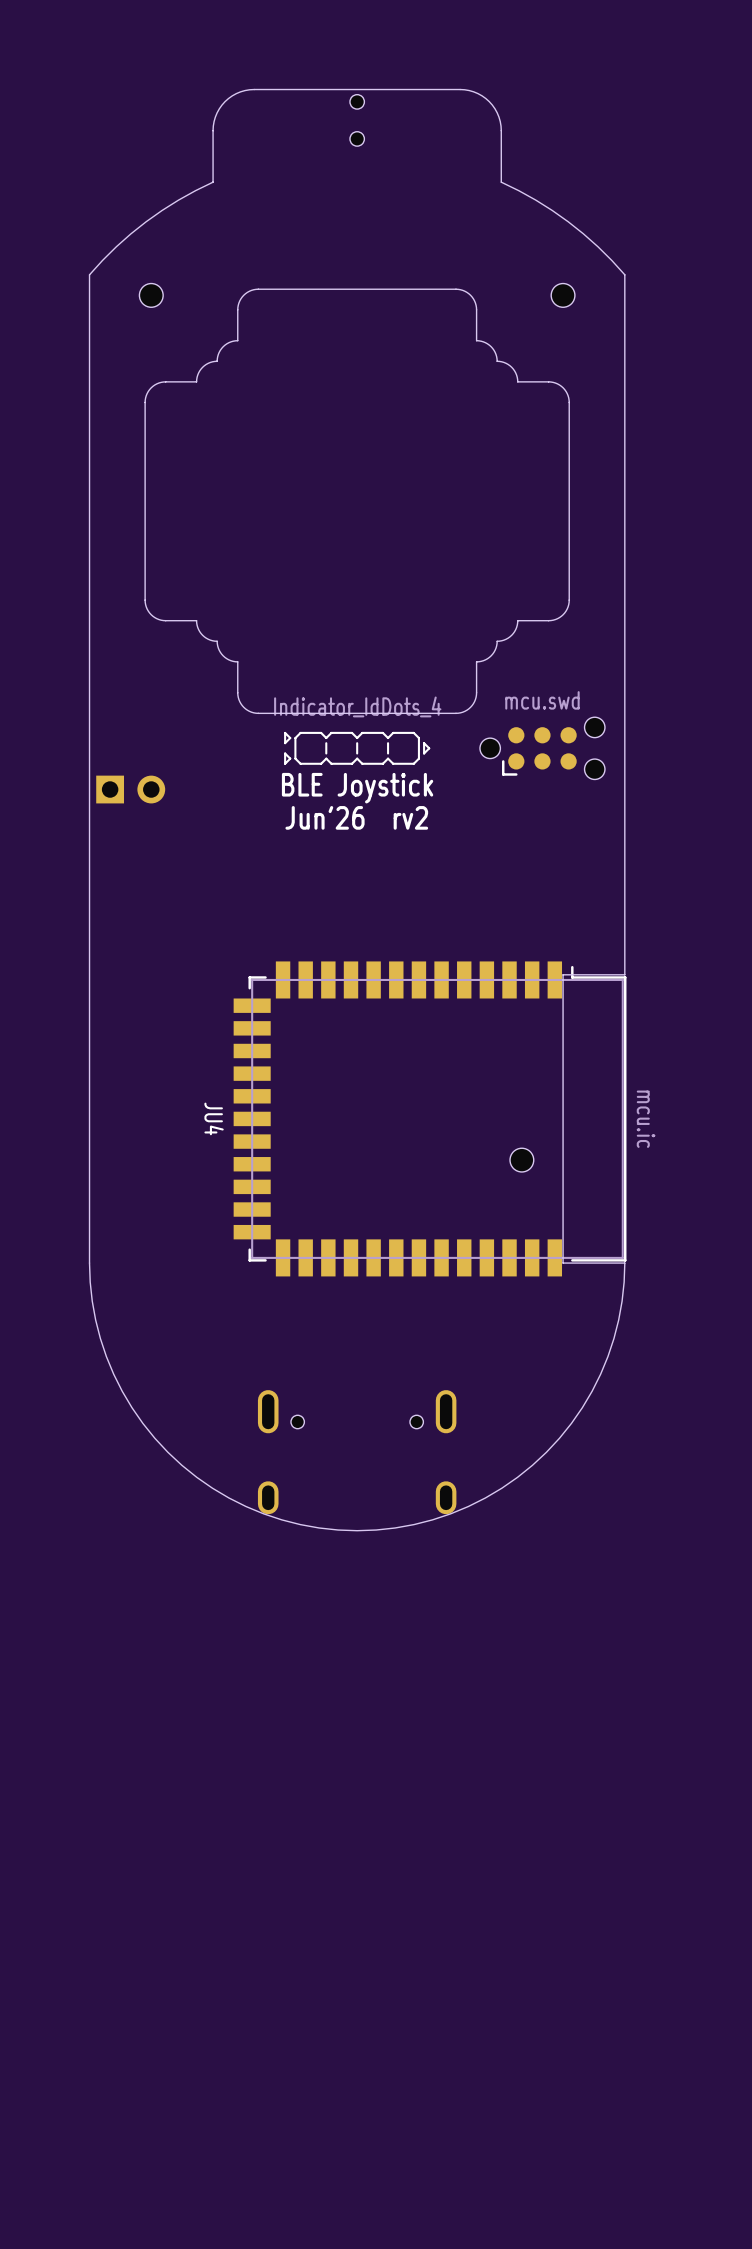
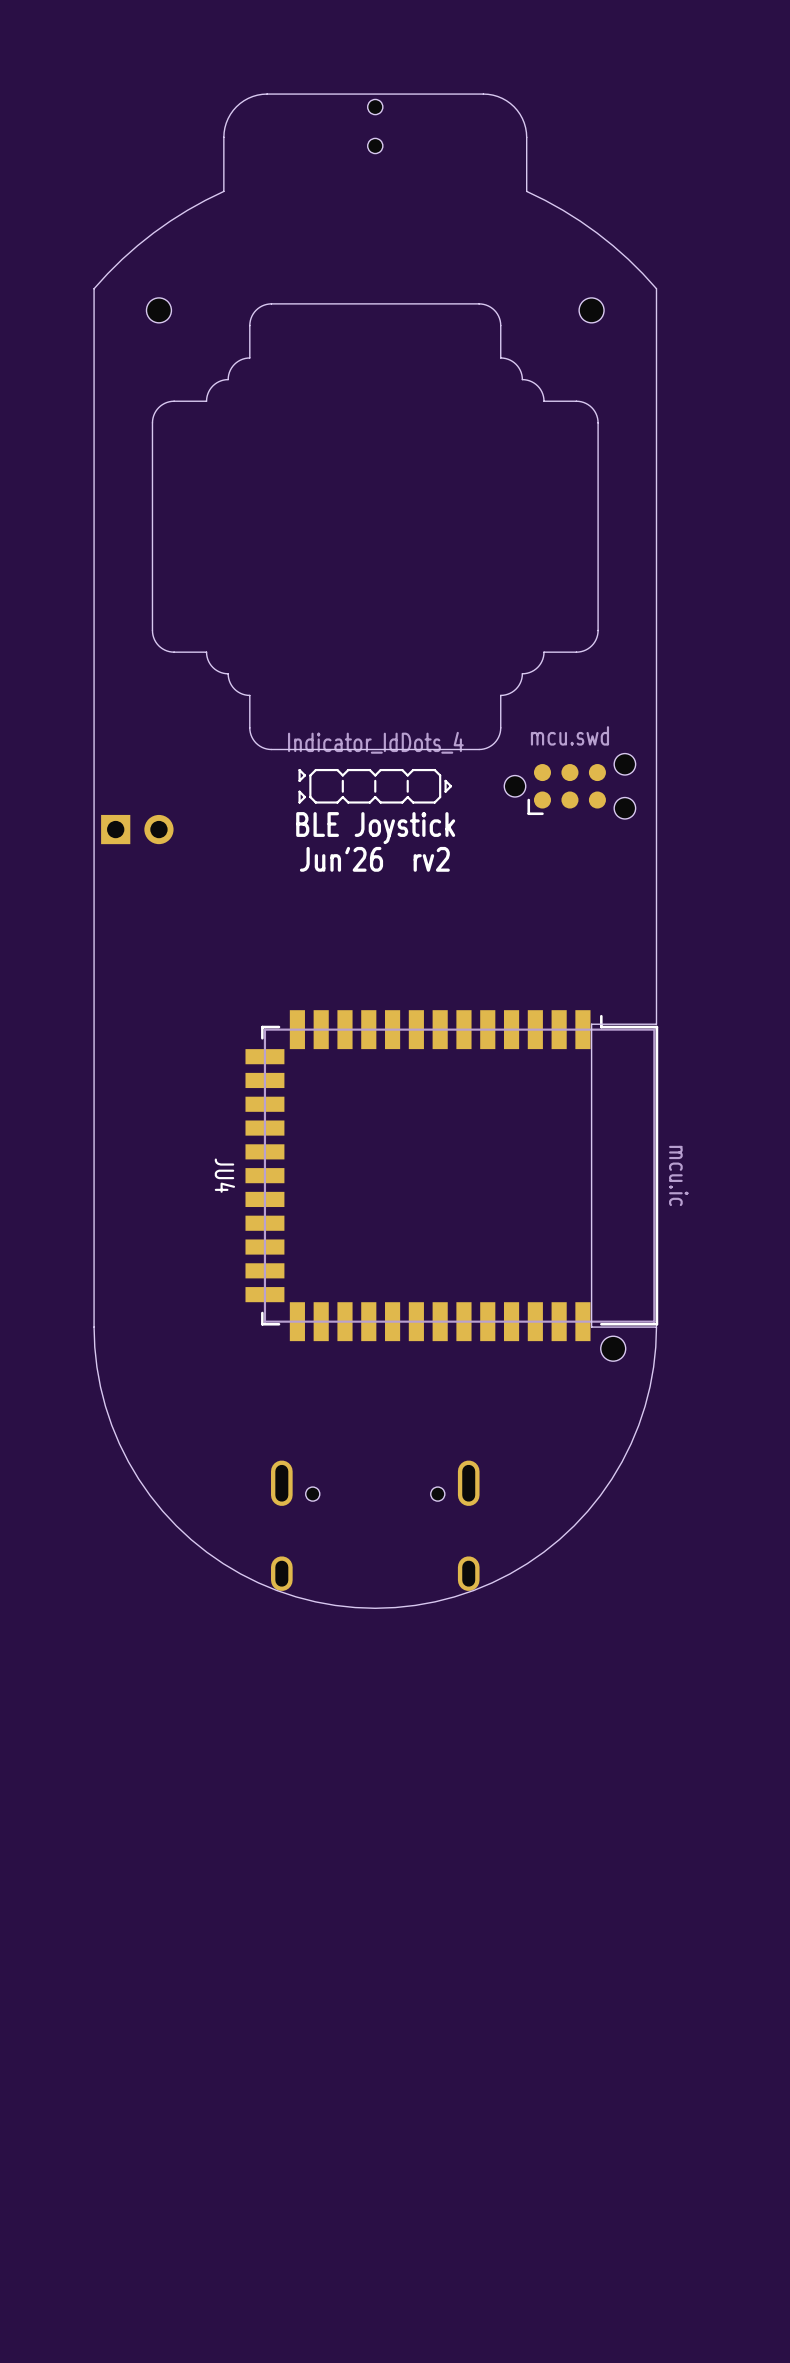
part position: (521, 1160) -> (613, 1348)

